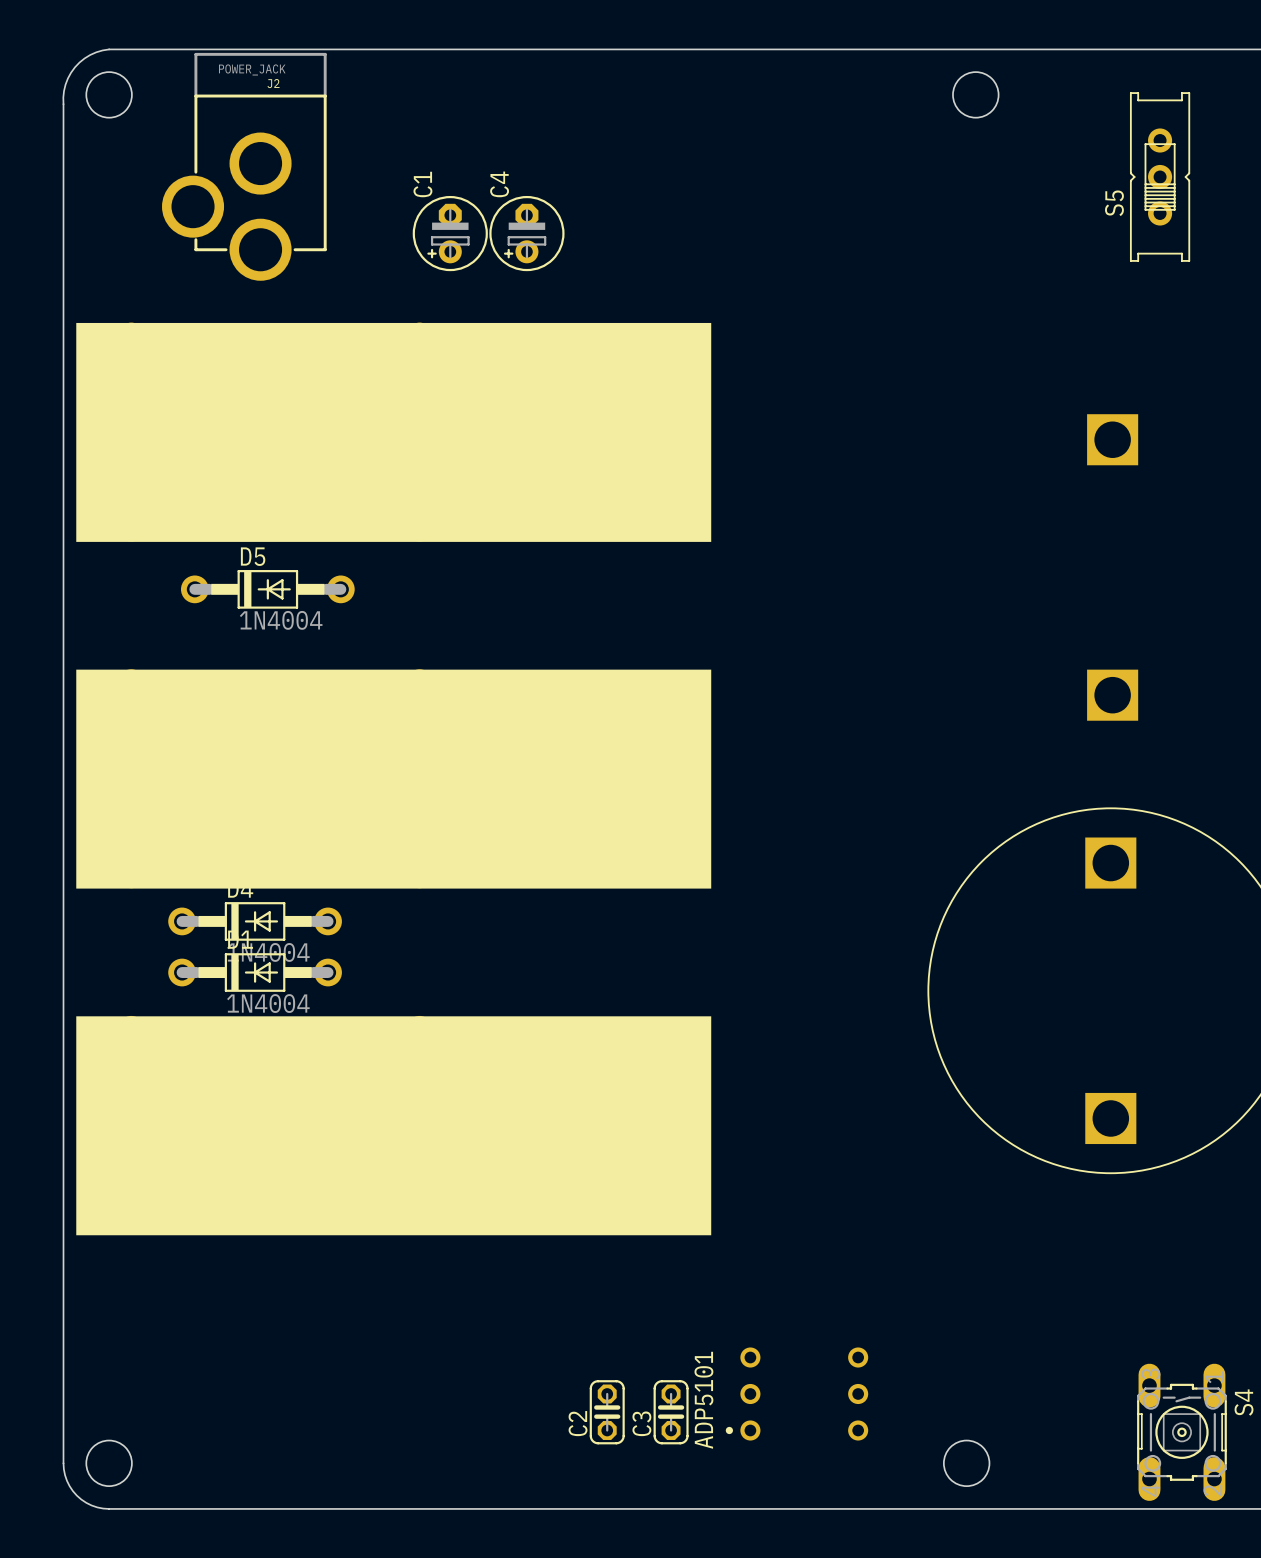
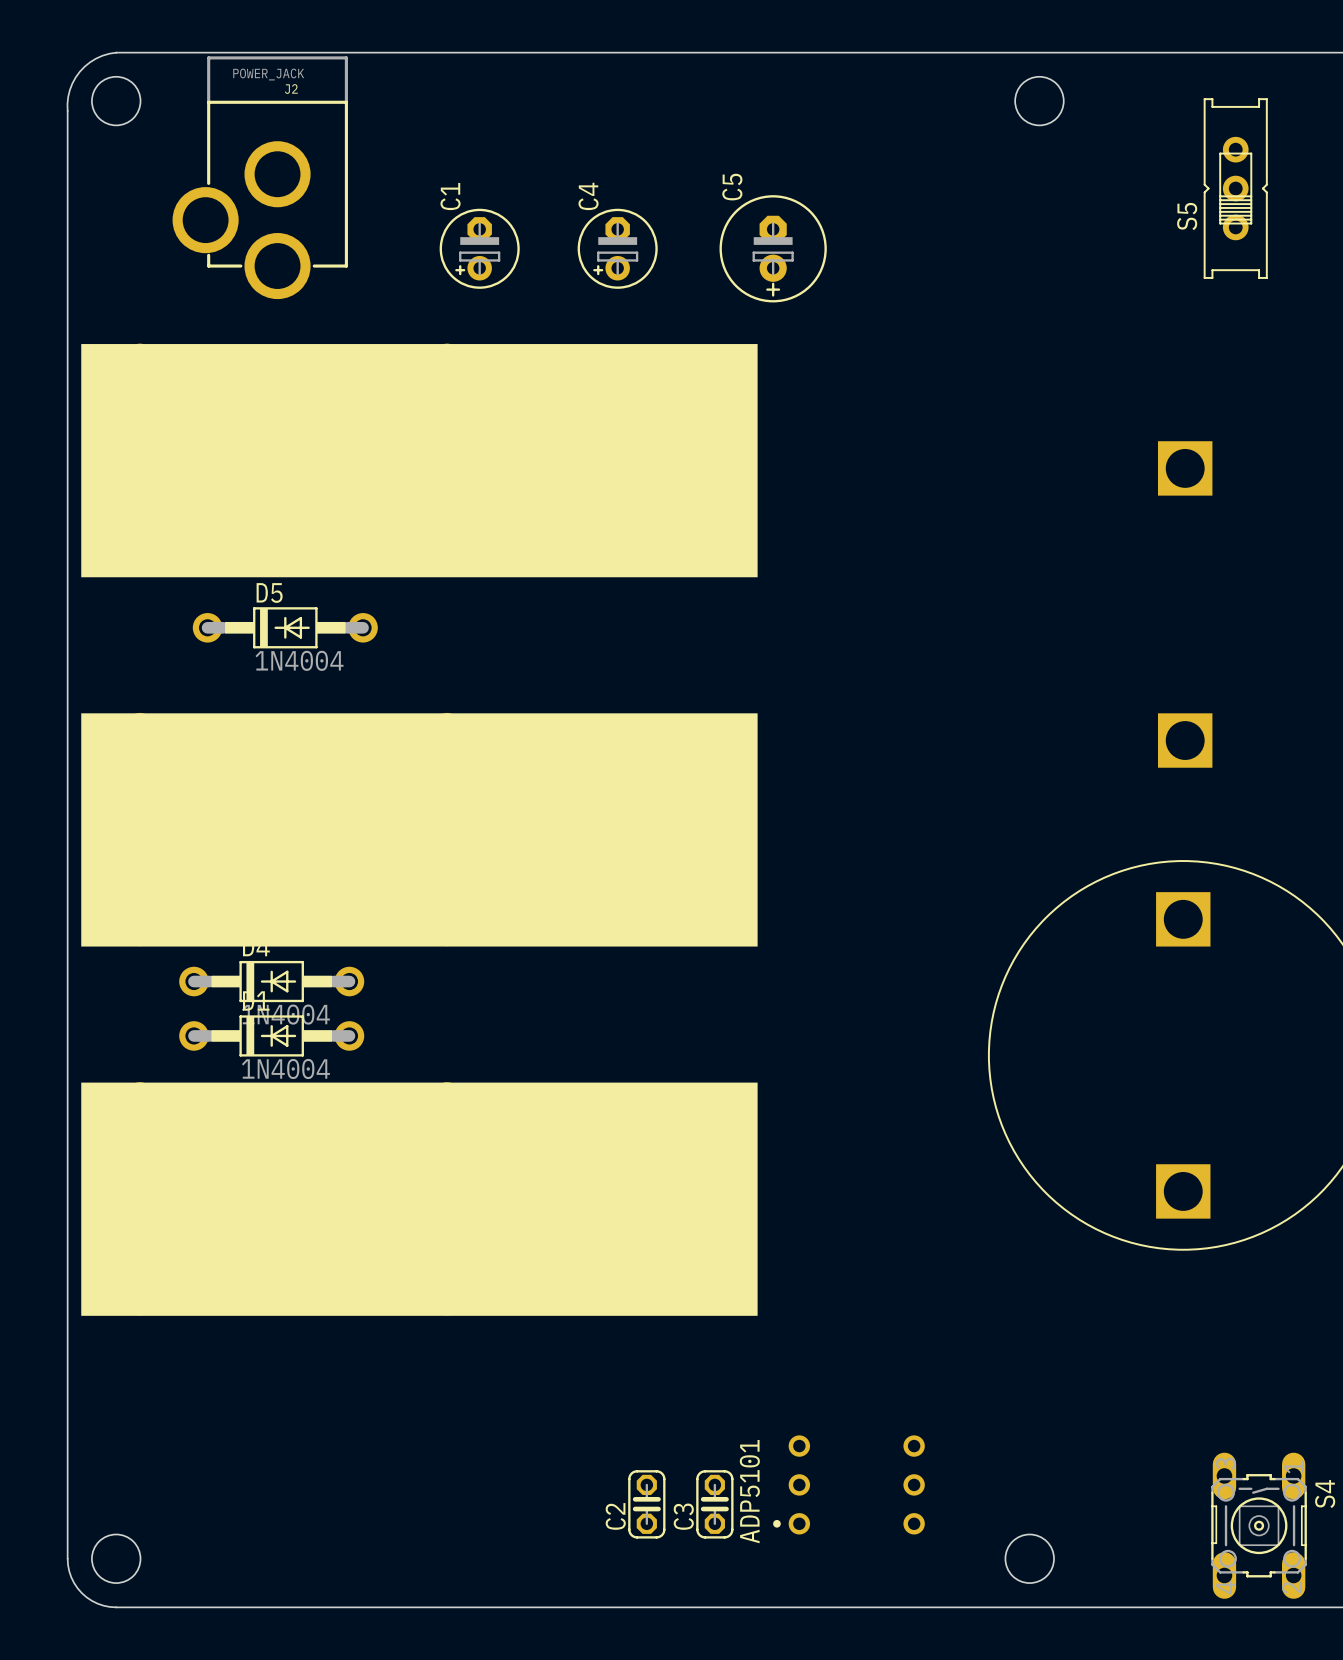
C4 position: (526, 233) -> (617, 248)
C5: none -> (773, 248)

